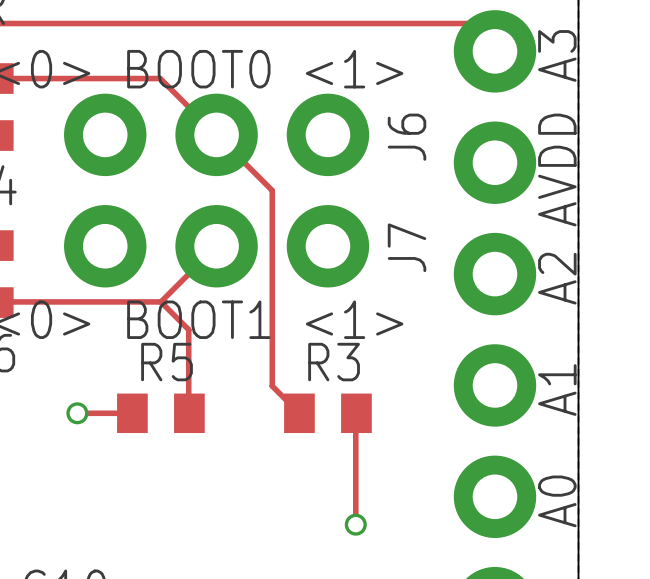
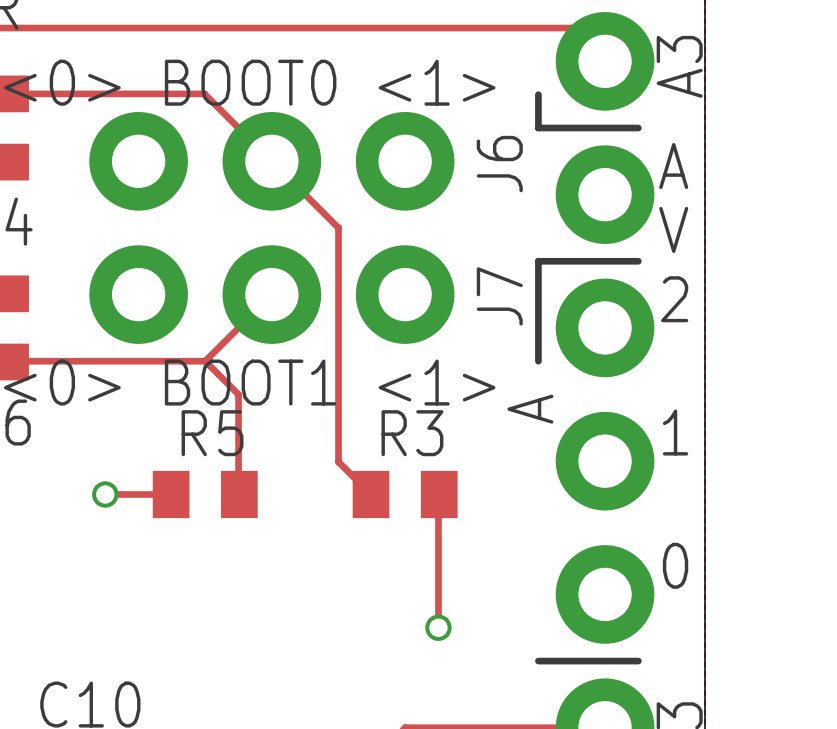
line: none -> (538, 94) (538, 128) (638, 128)
text: AVDD (557, 170) -> A (673, 165)
text: none -> V (673, 229)
line: none -> (638, 261) (538, 261) (538, 361)
text: A2 (557, 278) -> 2 (674, 299)
text: none -> A (530, 409)
text: A1 (557, 390) -> 1 (675, 432)
text: A0 (557, 501) -> 0 (675, 565)
line: none -> (538, 661) (638, 661)

